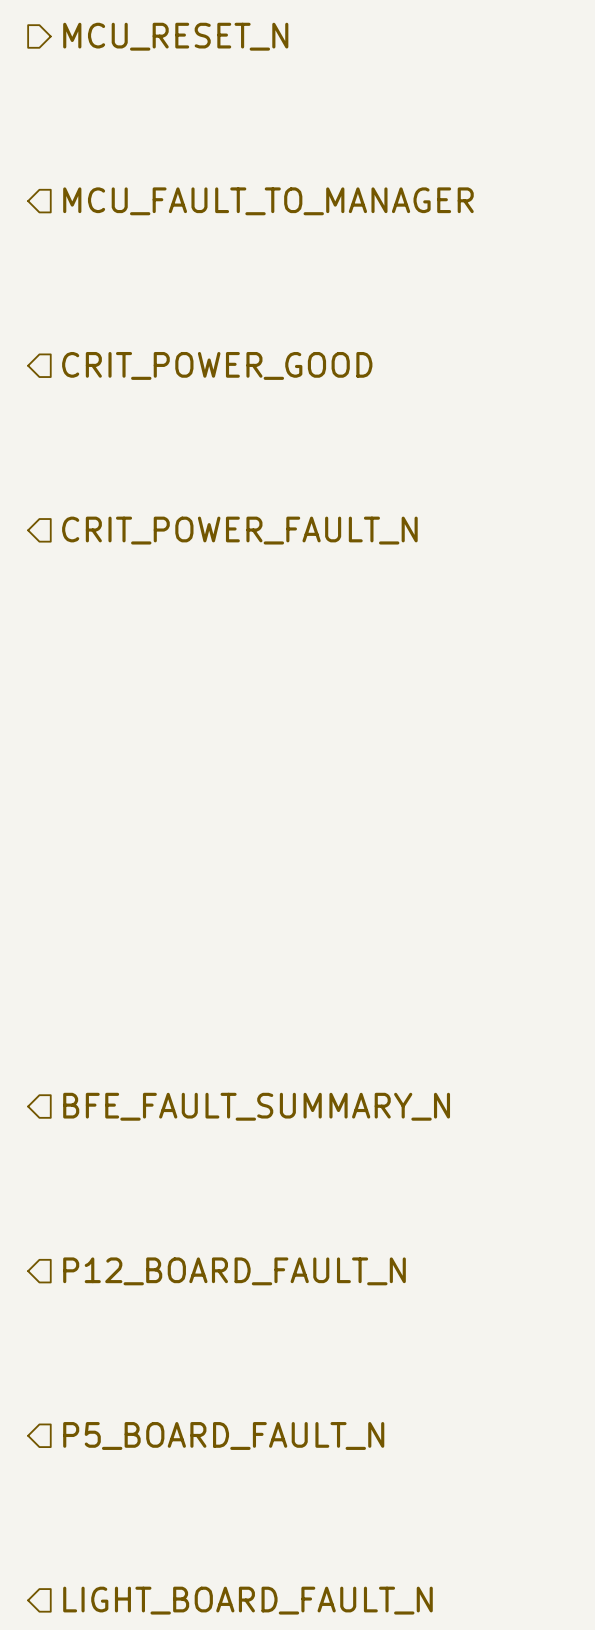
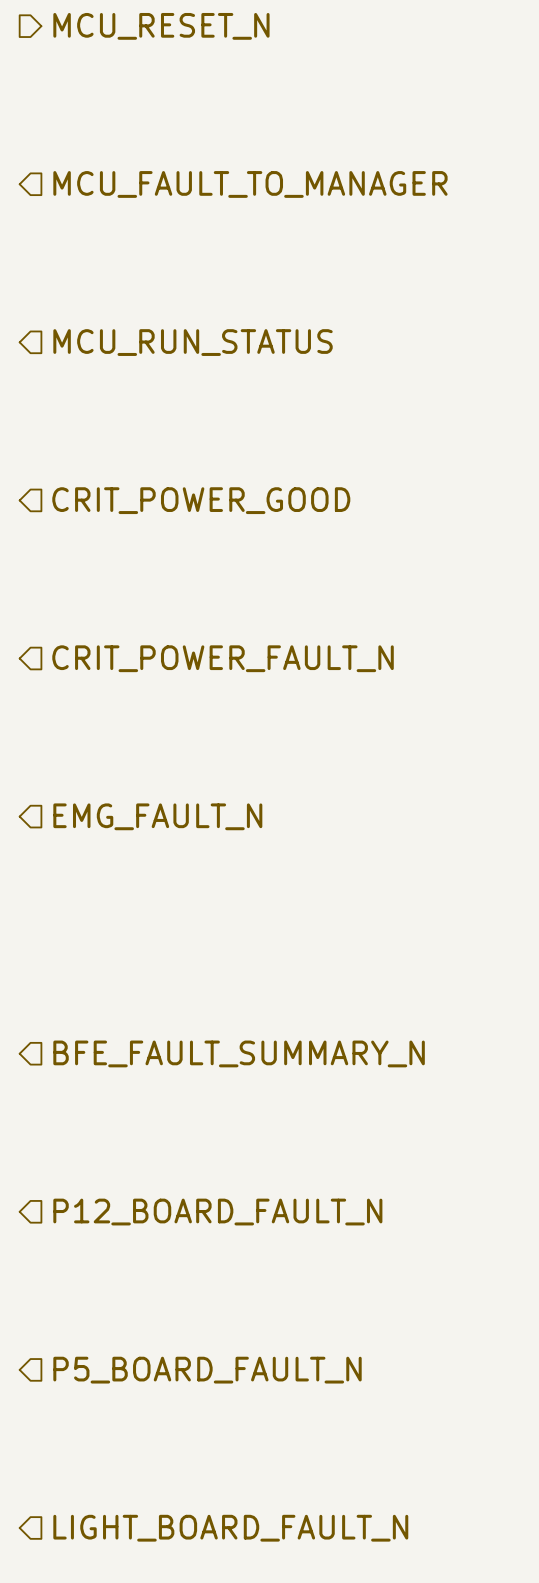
hierarchical label: CRIT_POWER_GOOD (217, 365) -> MCU_RUN_STATUS (193, 342)
hierarchical label: CRIT_POWER_FAULT_N (239, 530) -> CRIT_POWER_GOOD (201, 500)
hierarchical label: none -> CRIT_POWER_FAULT_N (223, 658)
hierarchical label: none -> EMG_FAULT_N (157, 816)

